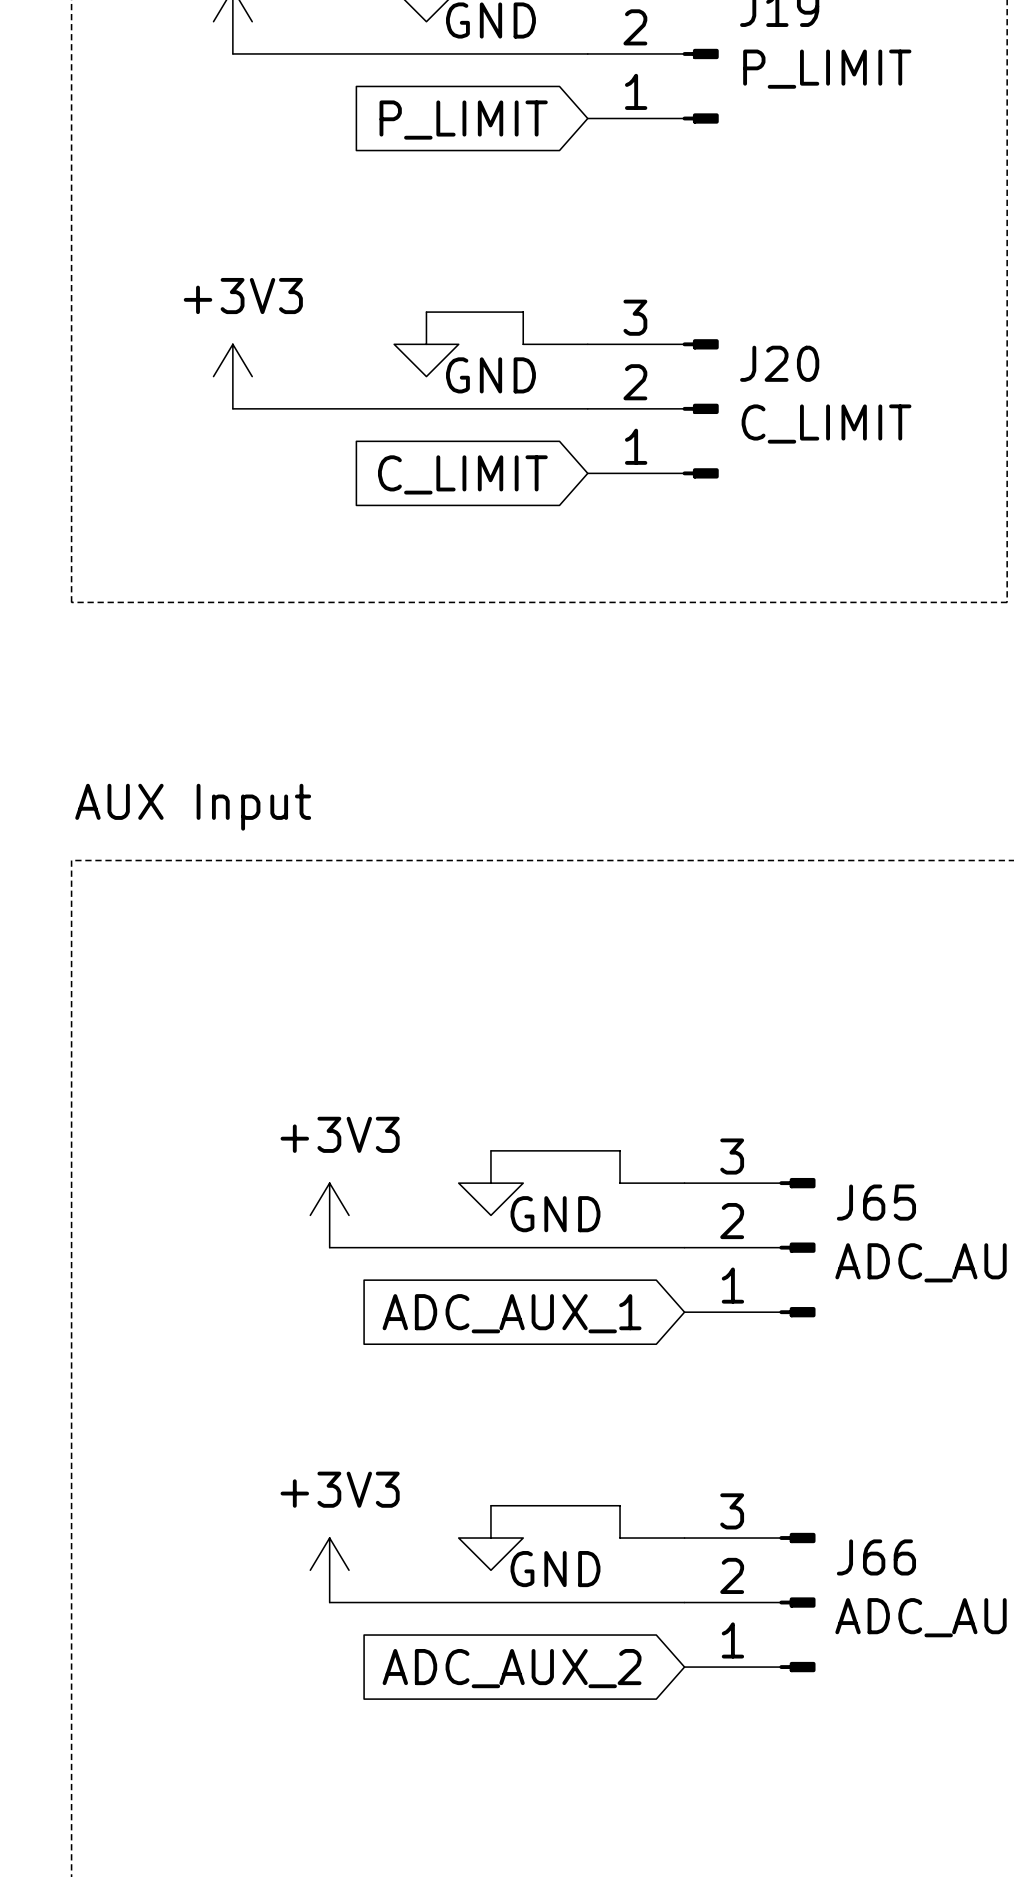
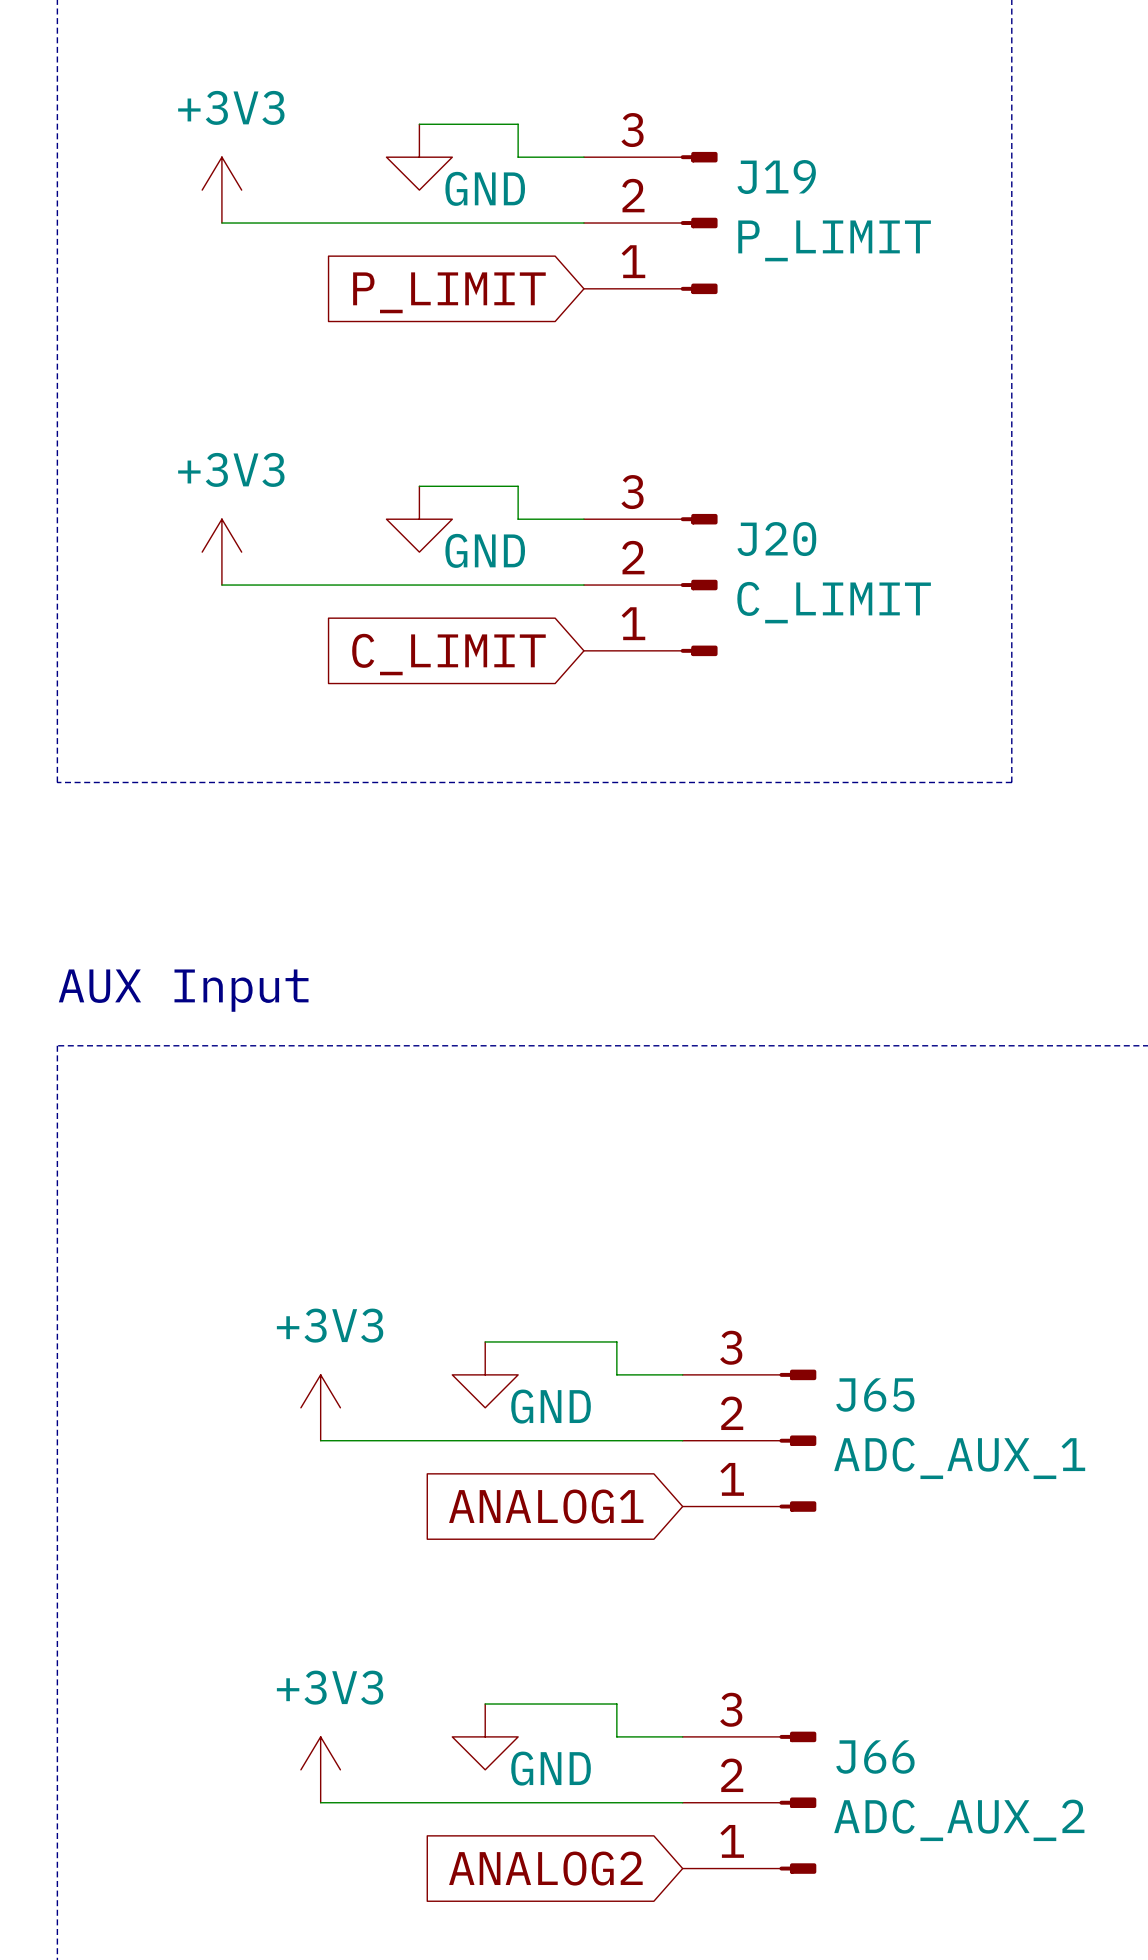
global label: ADC_AUX_1 (512, 1313) -> ANALOG1 (546, 1506)
global label: ADC_AUX_2 (512, 1668) -> ANALOG2 (545, 1868)

